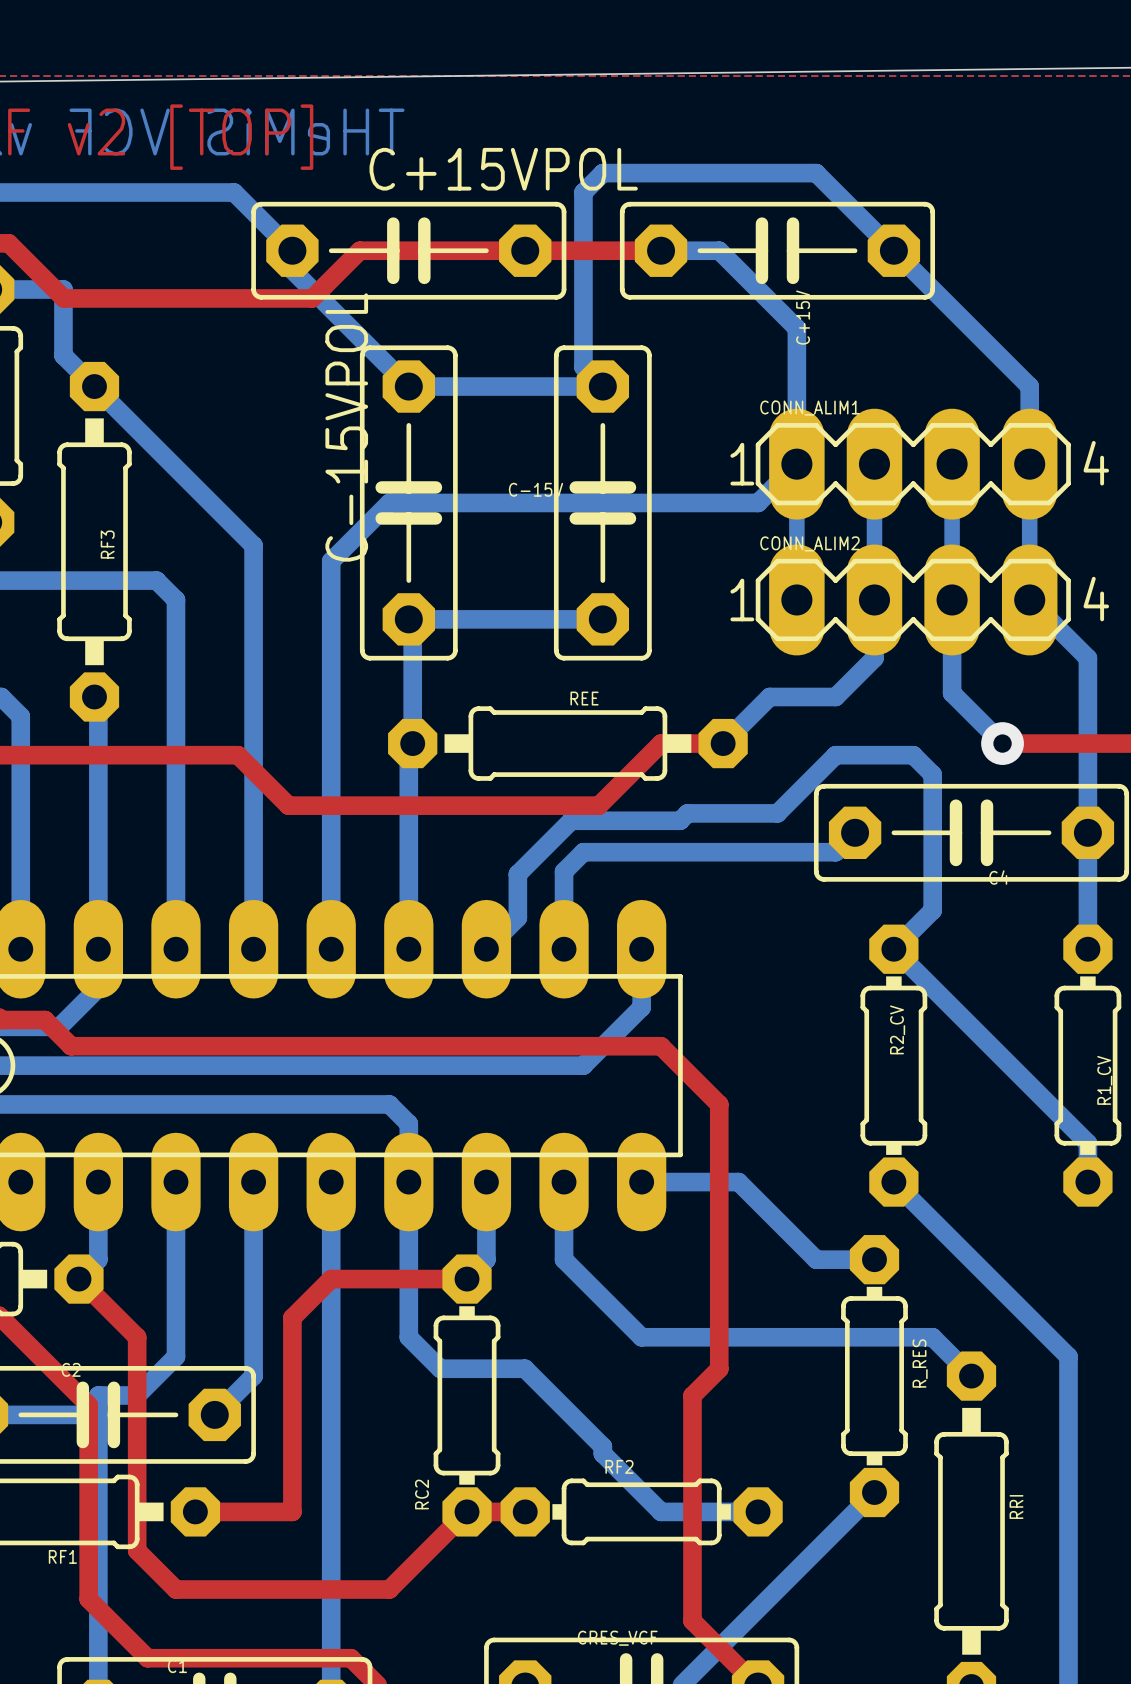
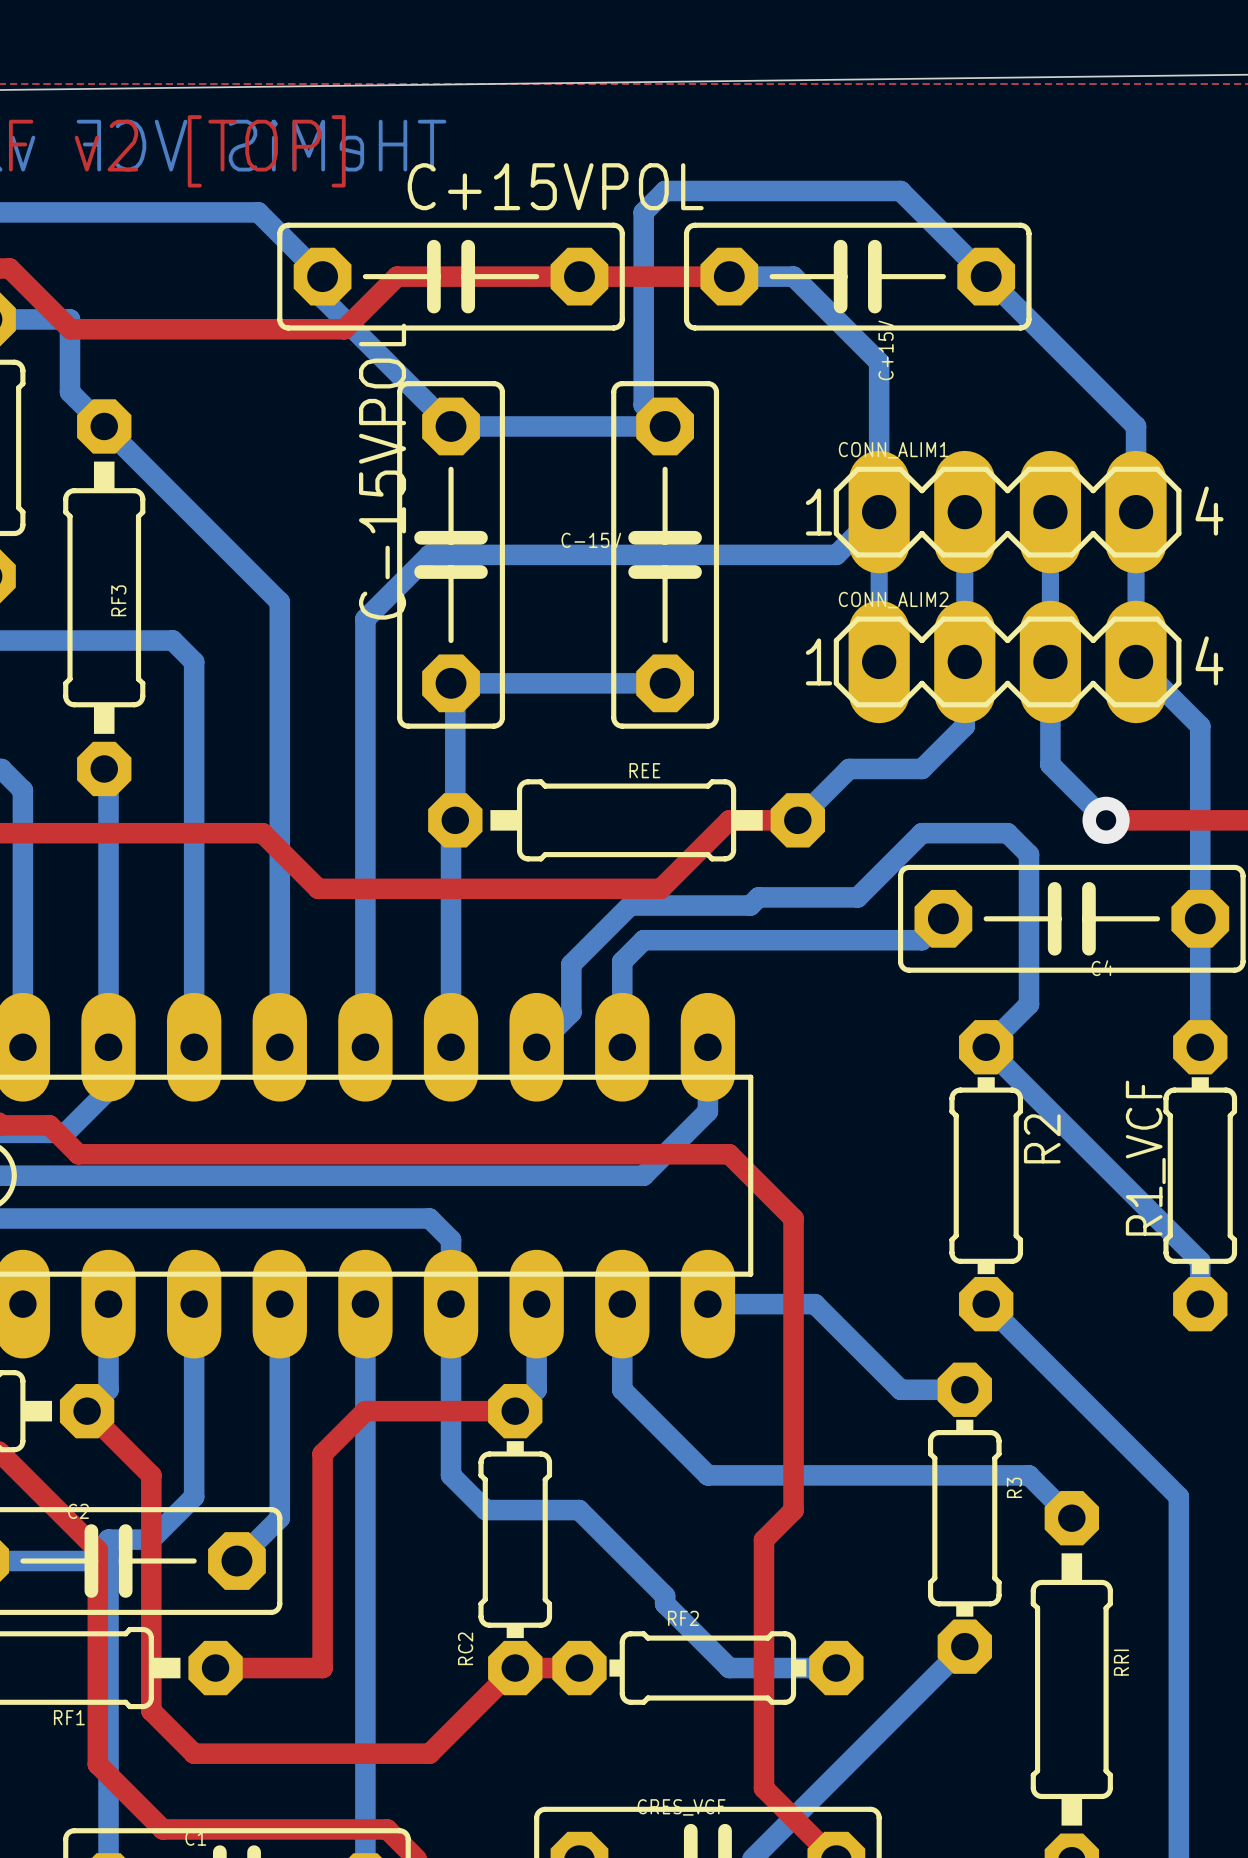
R2_CV name: R2_CV (897, 1029) -> R2 (1042, 1138)
R1_CV name: R1_CV (1104, 1080) -> R1_VCF (1145, 1158)
R_RES name: R_RES (920, 1363) -> R3 (1014, 1487)

